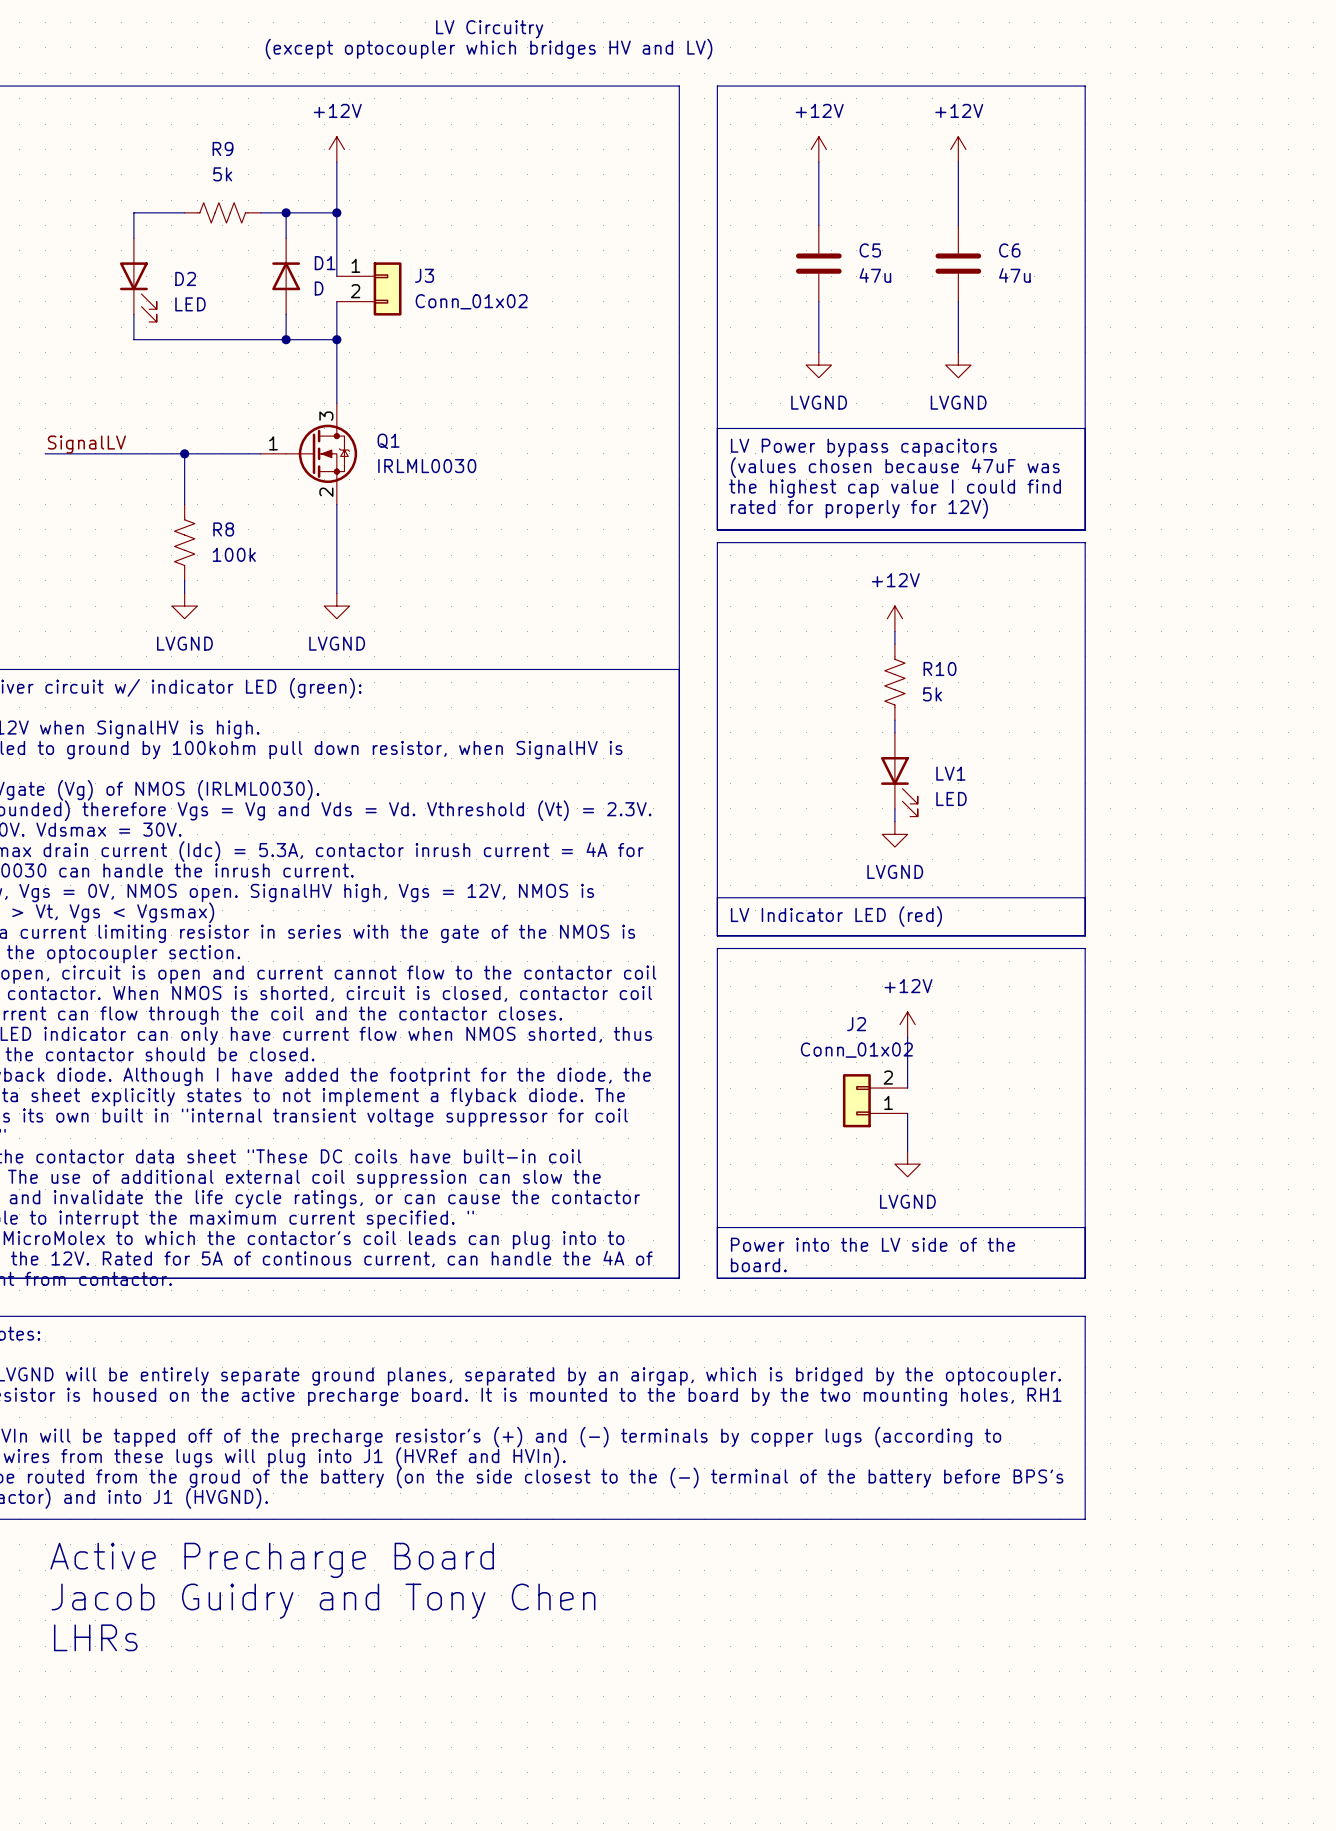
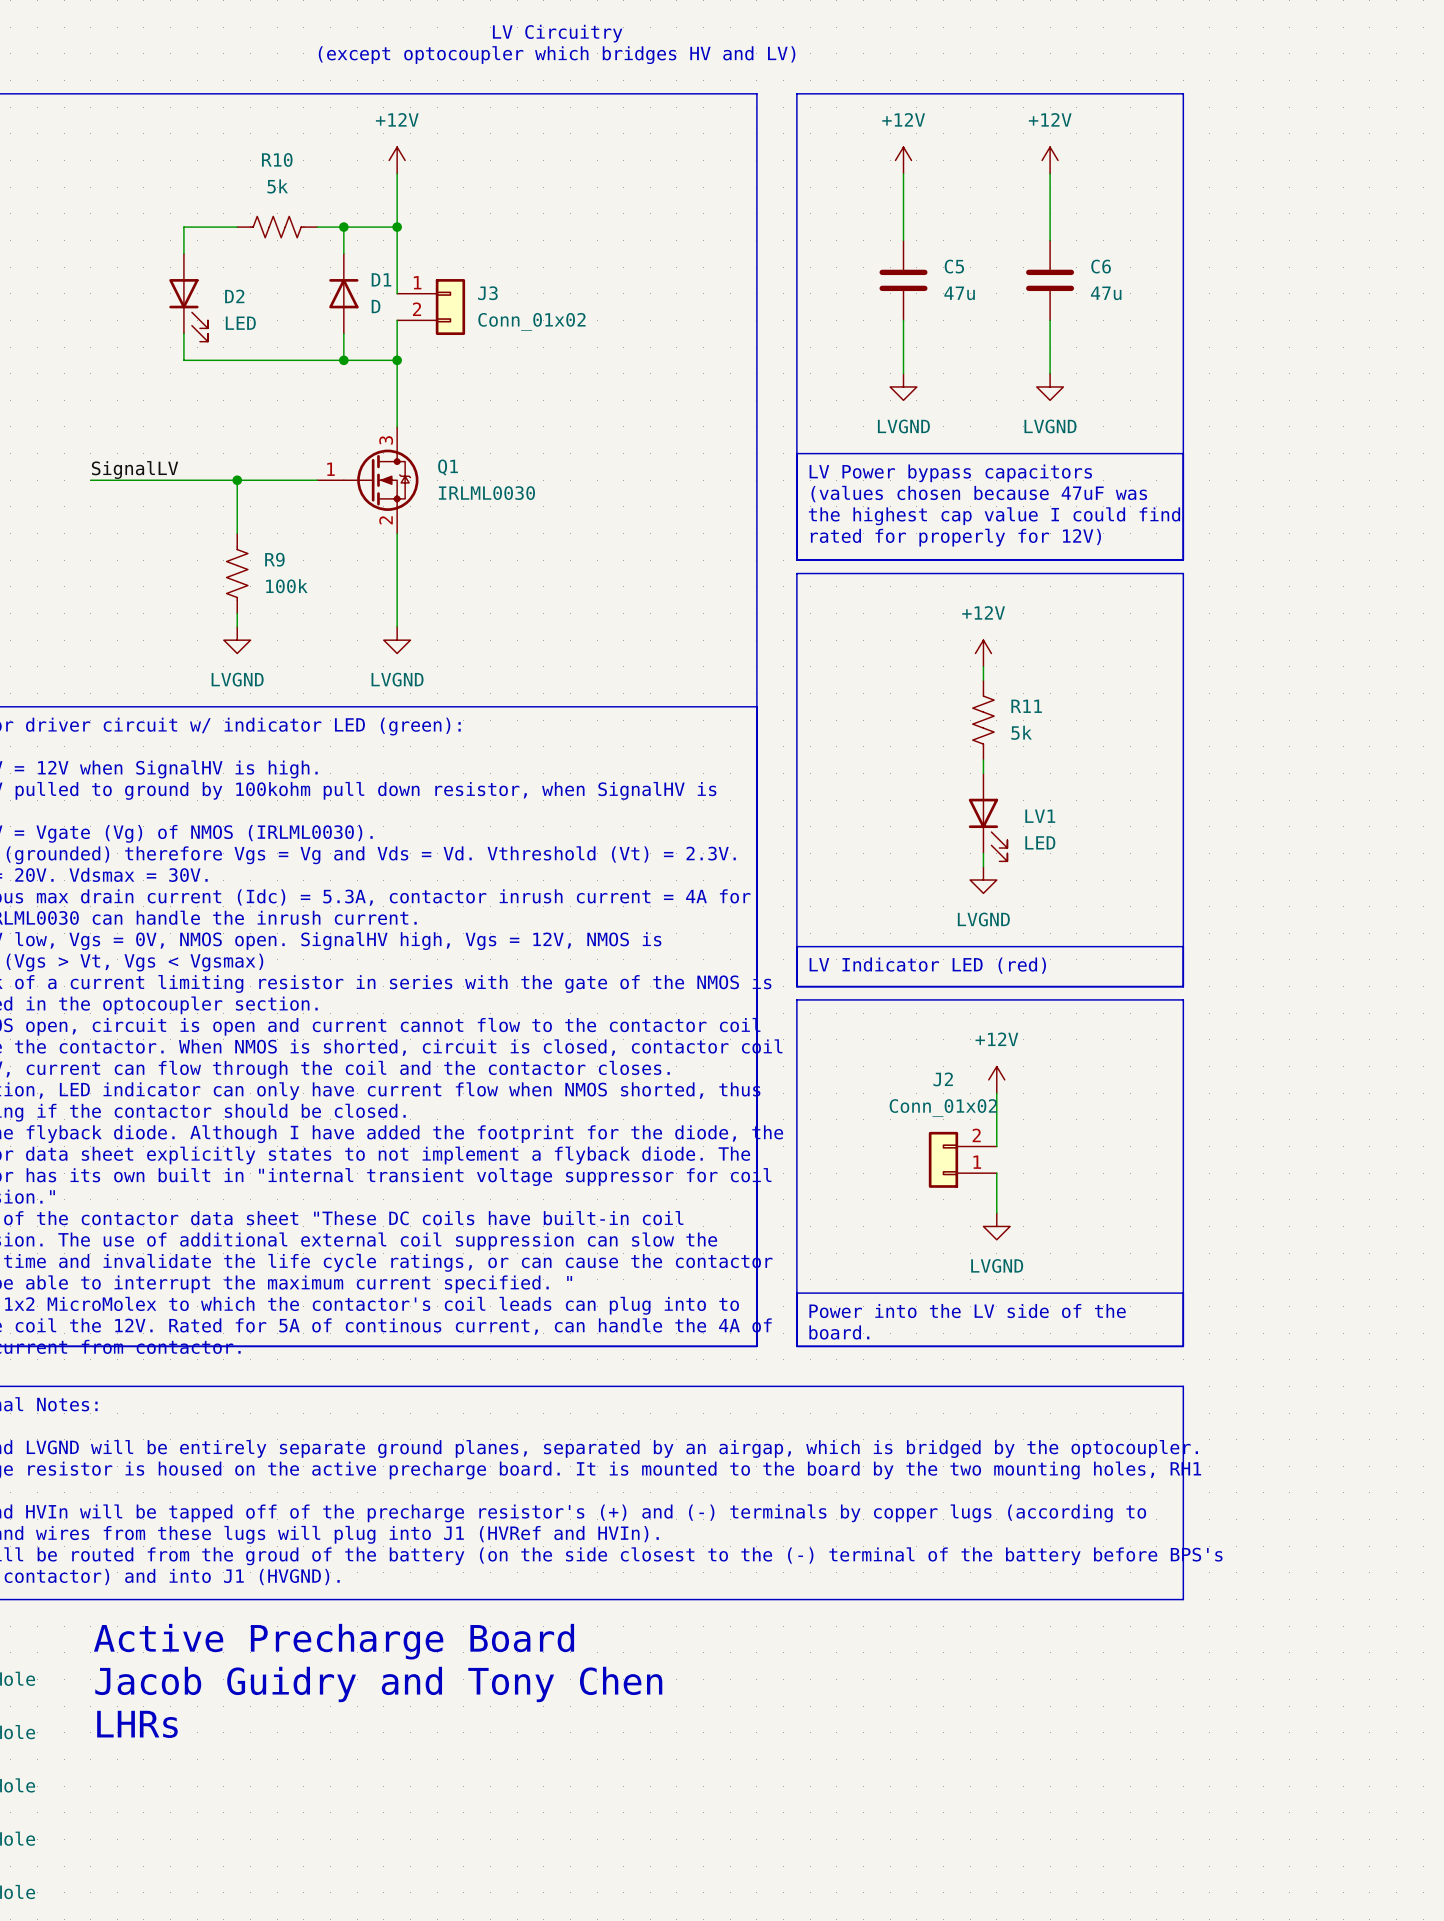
R9 name: R9 (223, 148) -> R10 (277, 159)
R8 name: R8 (223, 529) -> R9 (274, 559)
R10 name: R10 (940, 668) -> R11 (1026, 706)

